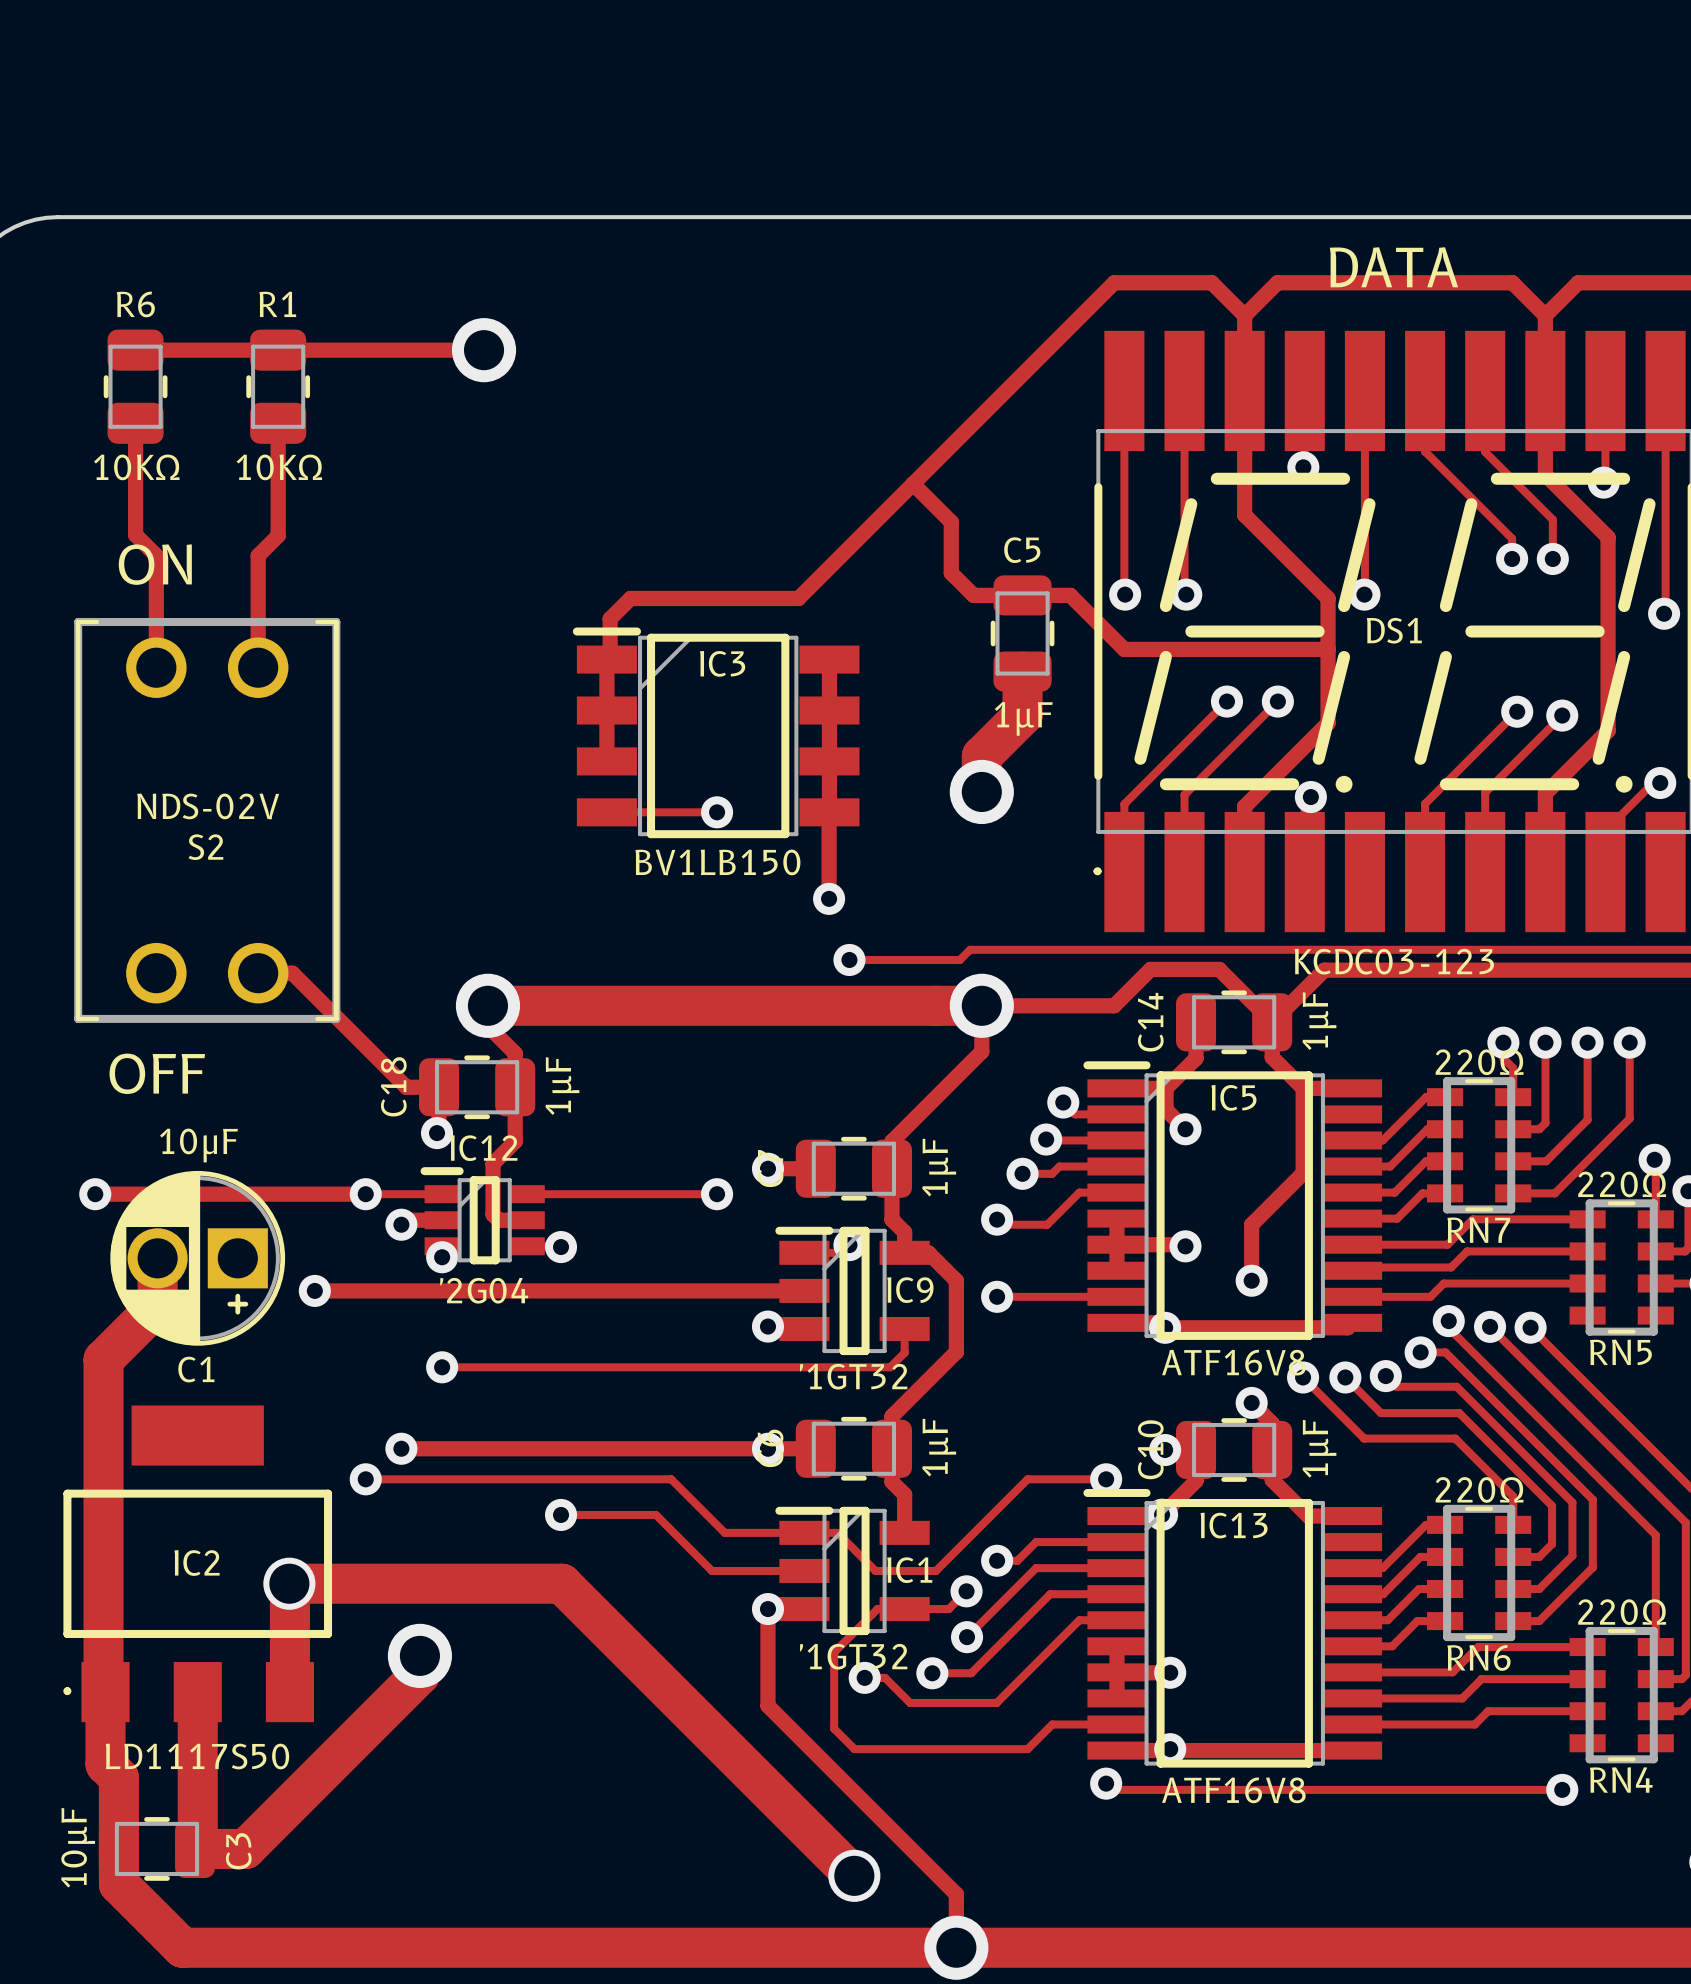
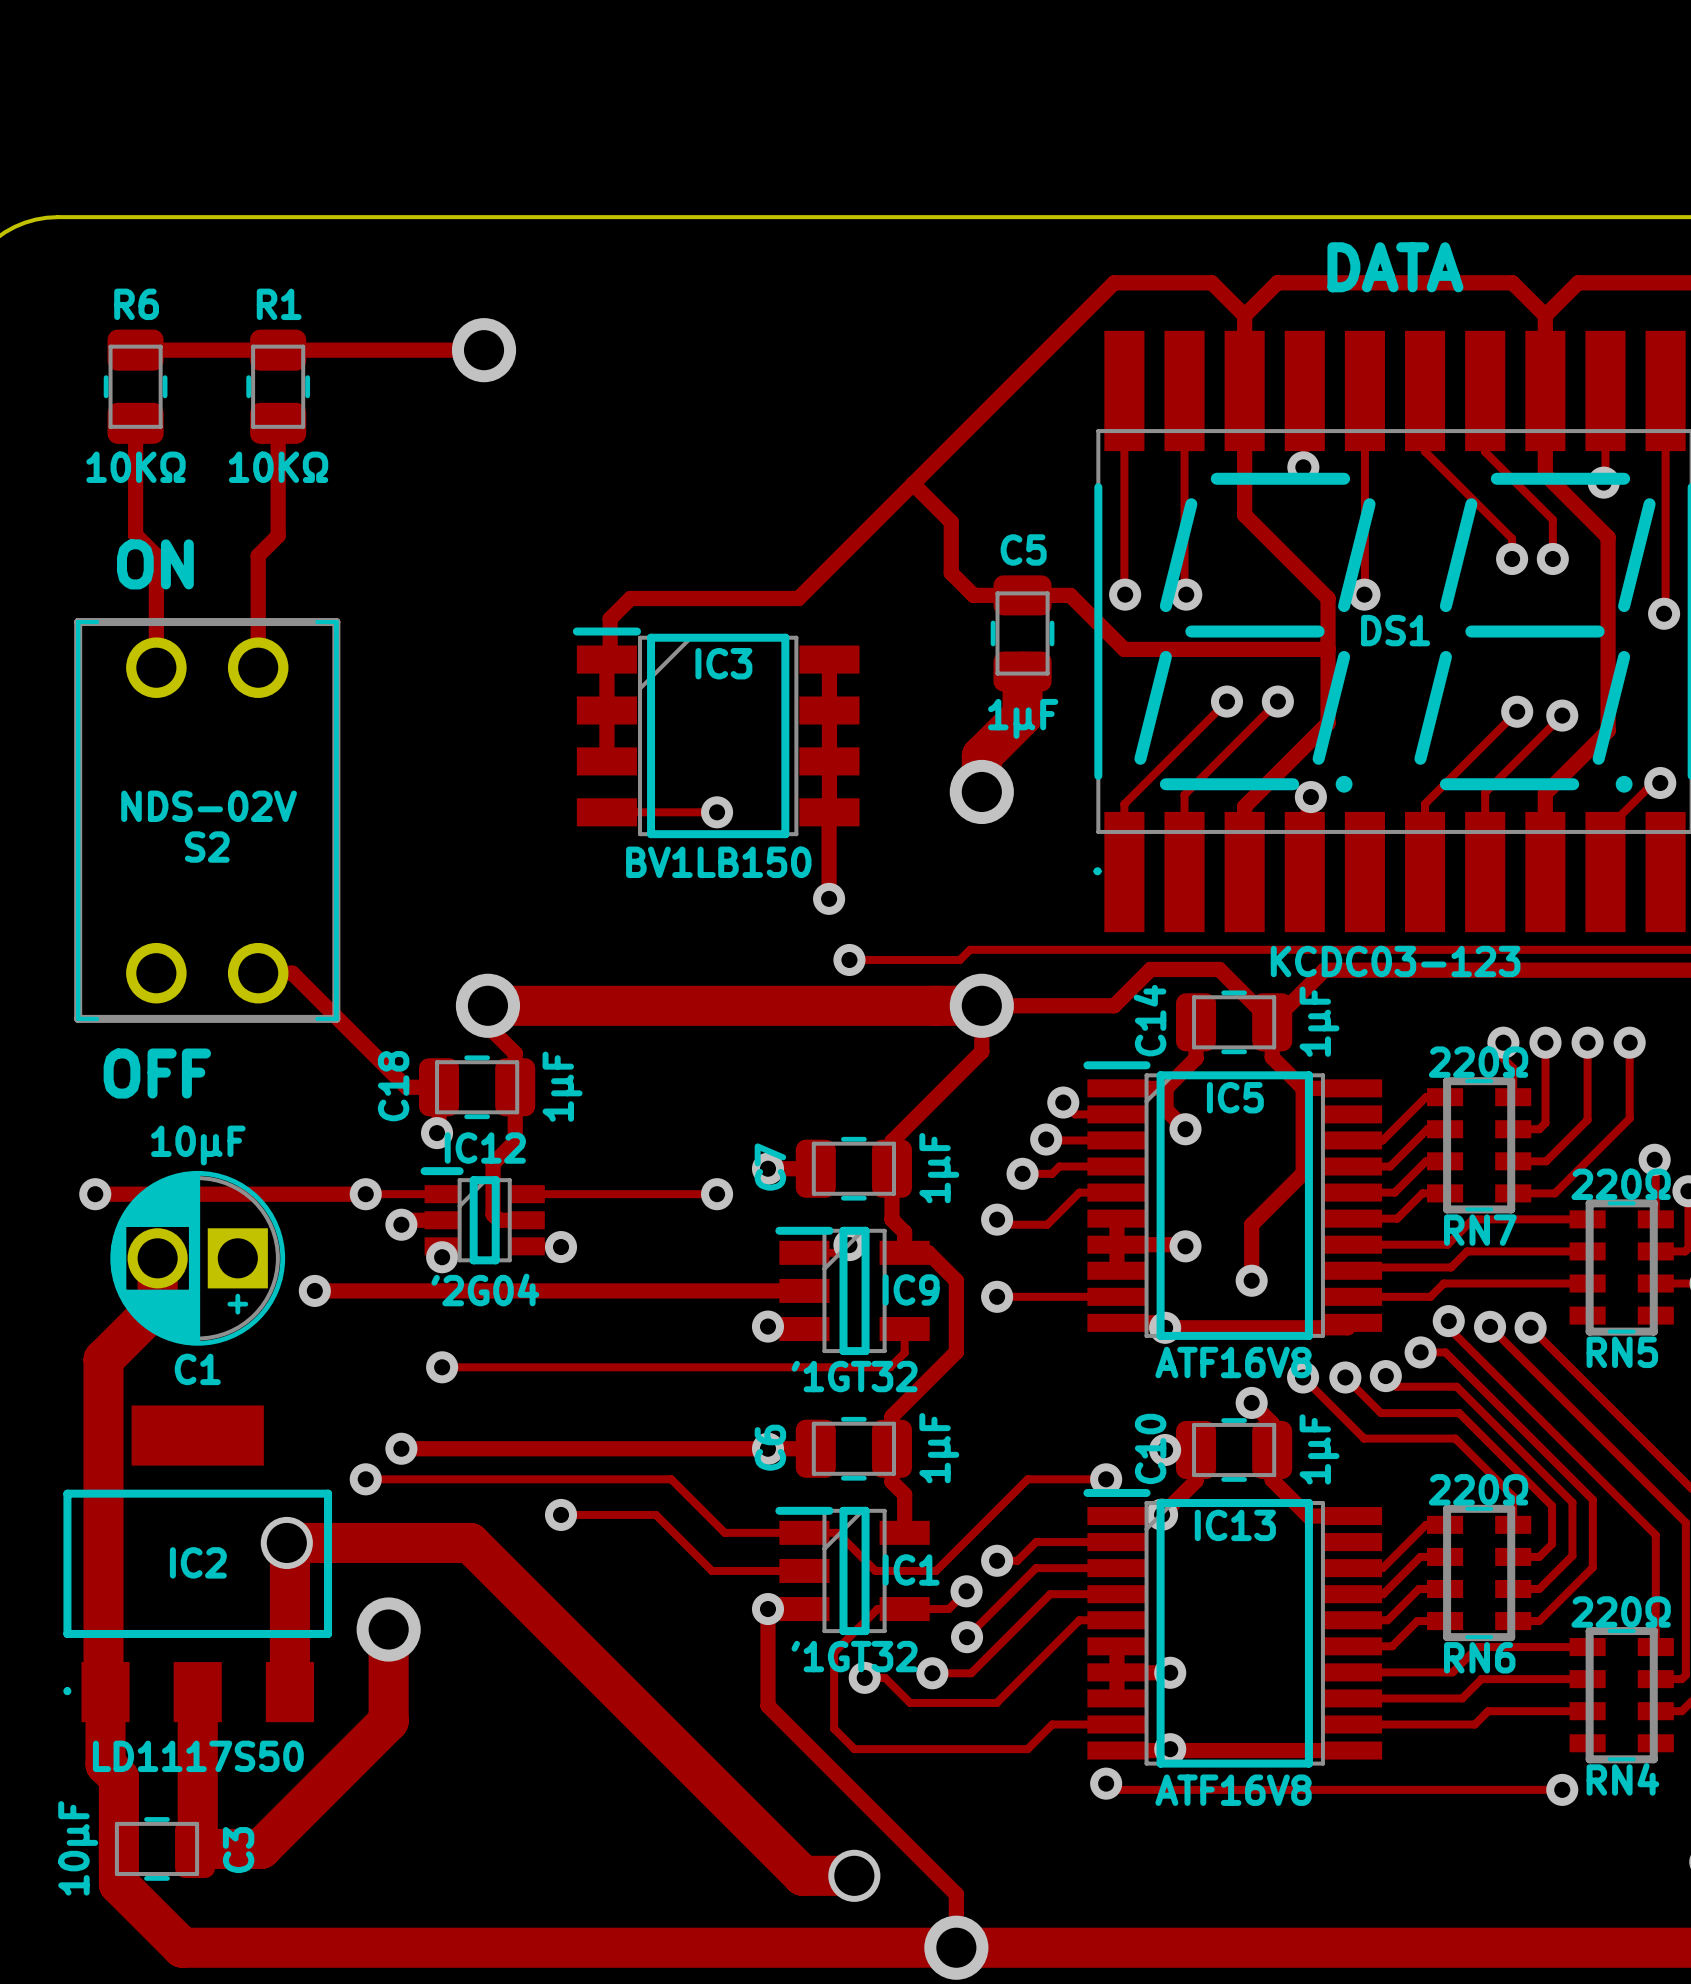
track: (289, 1583) (561, 1583) (853, 1875) -> (289, 1584) (289, 1546) (286, 1542) (470, 1542) (803, 1875) (853, 1875)
via position: (289, 1583) -> (286, 1542)
track: (419, 1655) (419, 1674) (245, 1848) -> (388, 1629) (388, 1721) (260, 1848) (245, 1848)
via position: (419, 1655) -> (388, 1629)

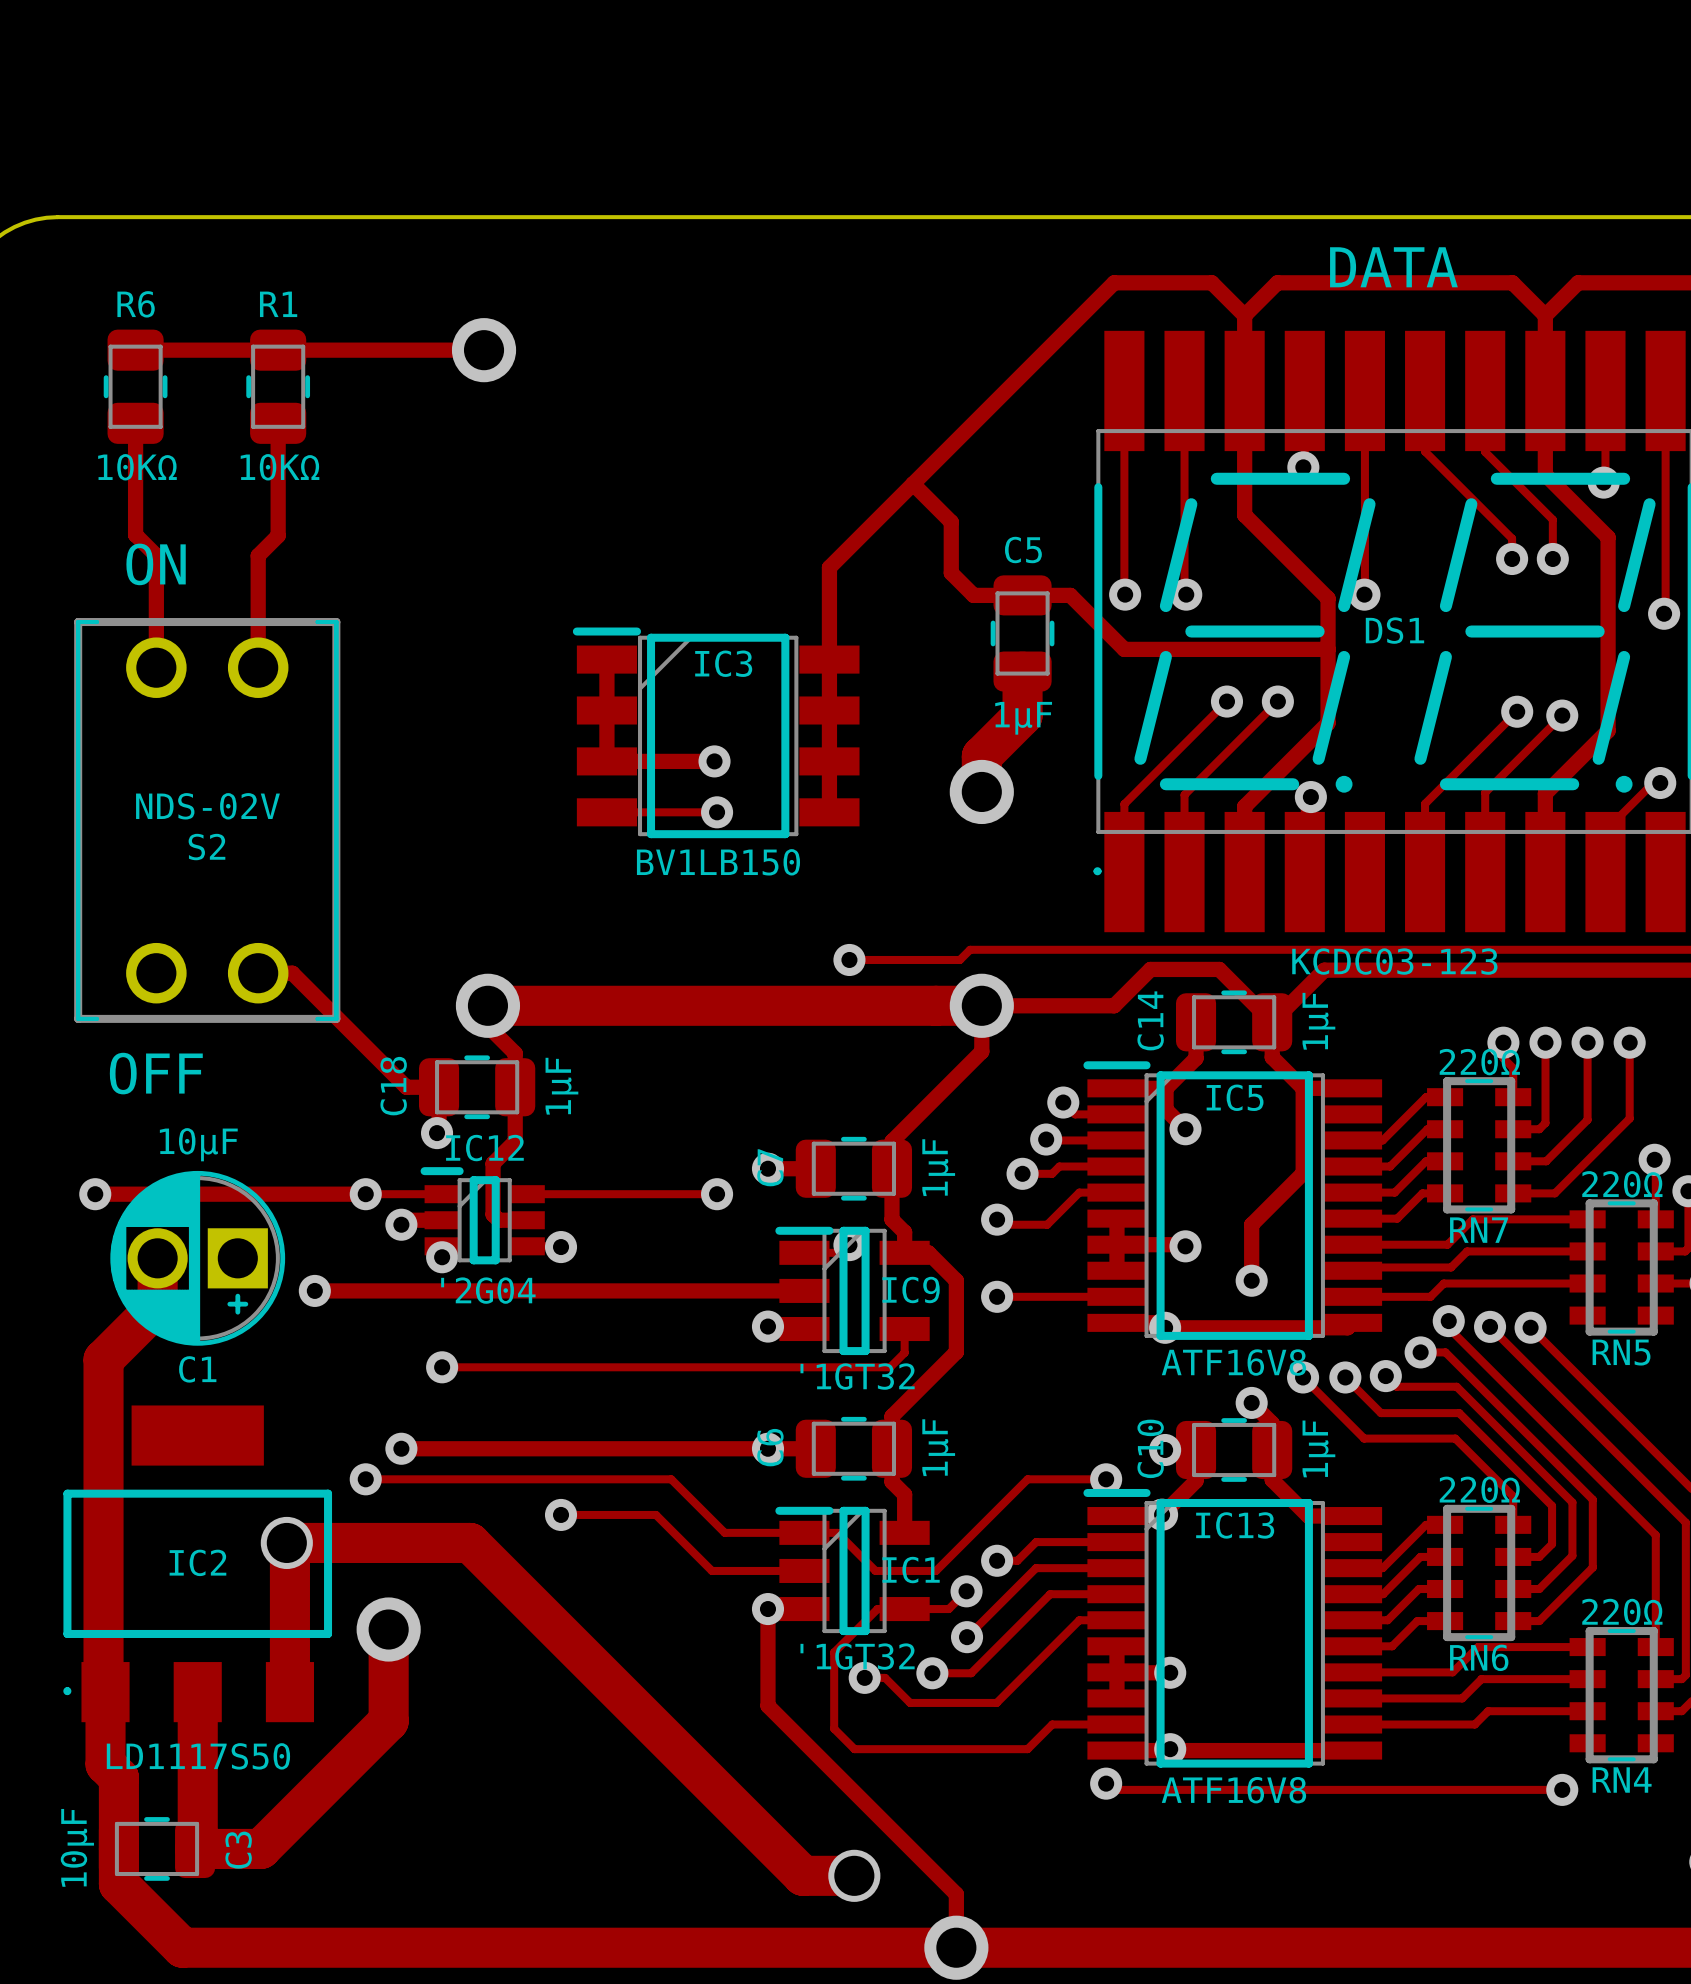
track: (829, 567) (798, 598) (630, 598) (610, 618) (610, 656) -> (829, 567) (829, 659)
track: none -> (606, 761) (714, 761)
track: (829, 812) (829, 898) -> none
via position: (829, 898) -> (714, 761)

